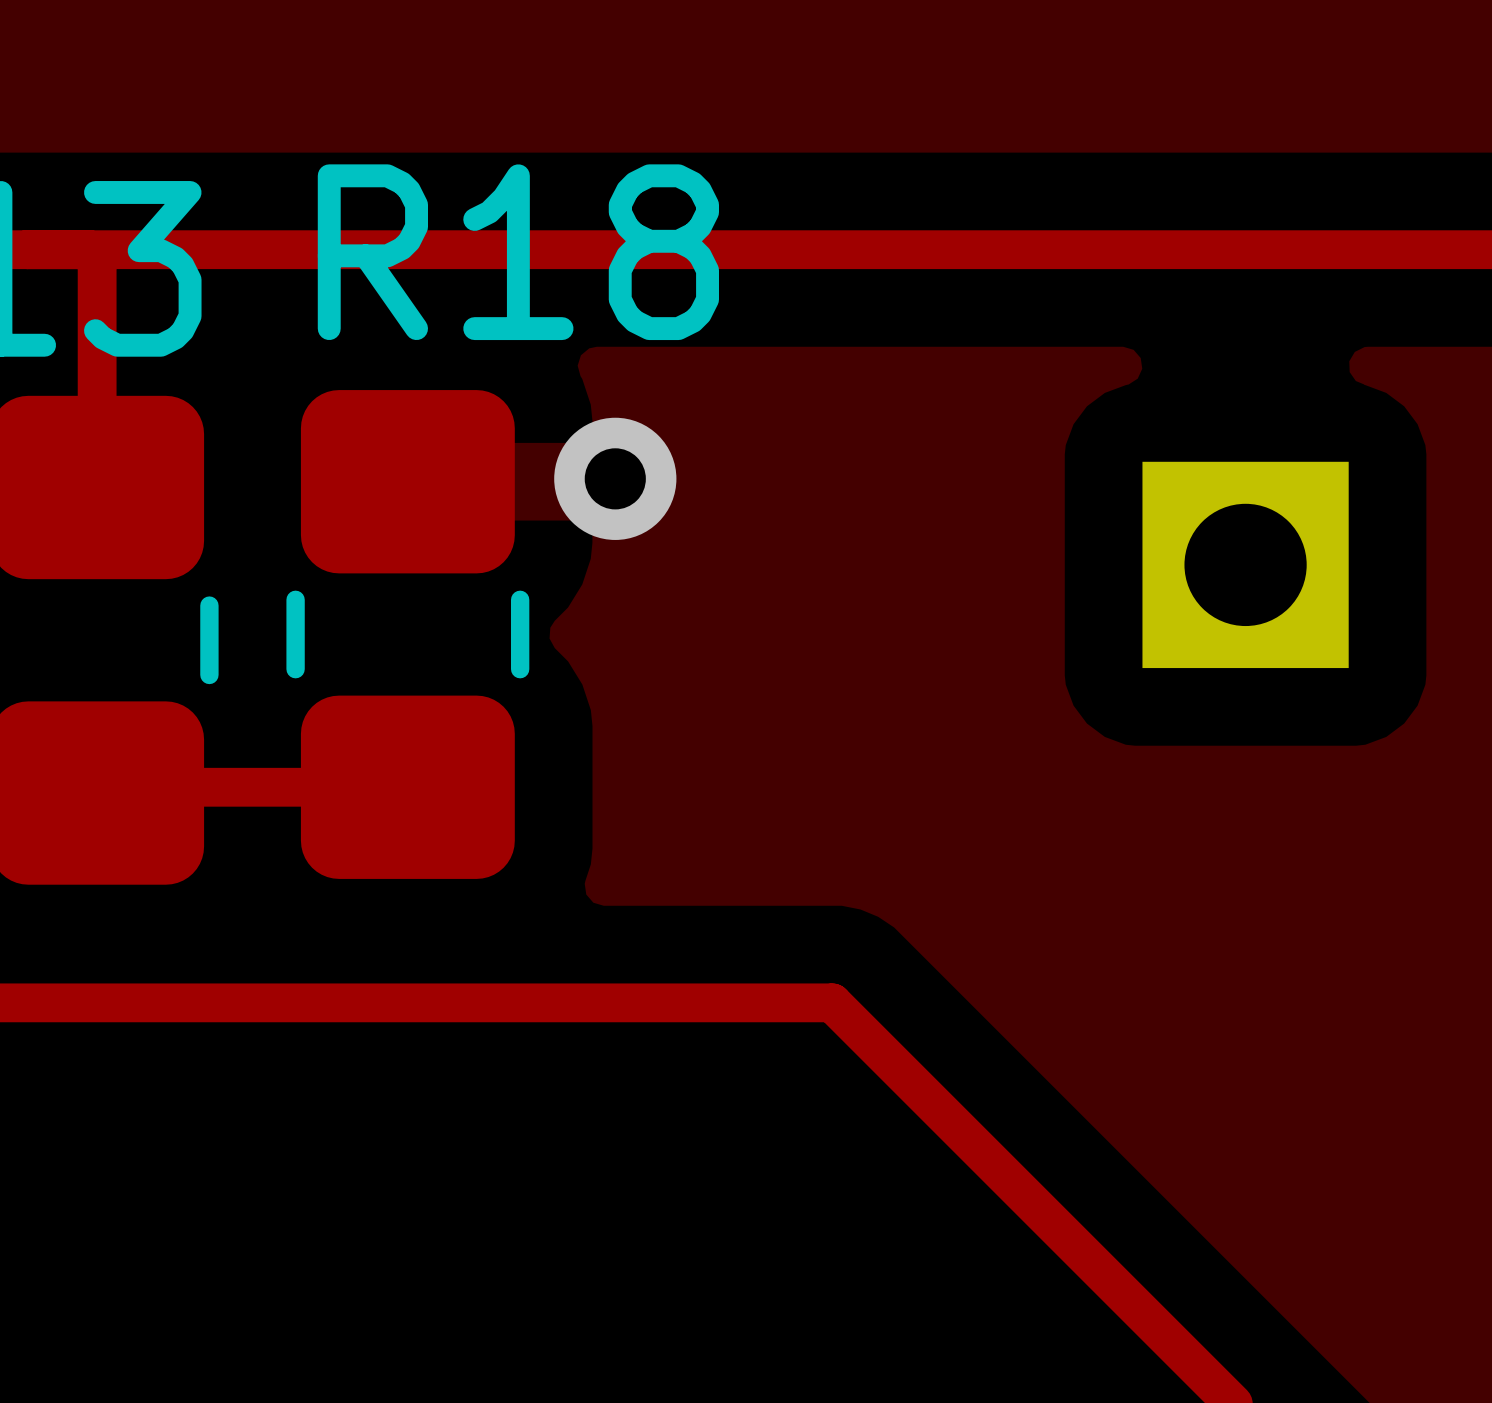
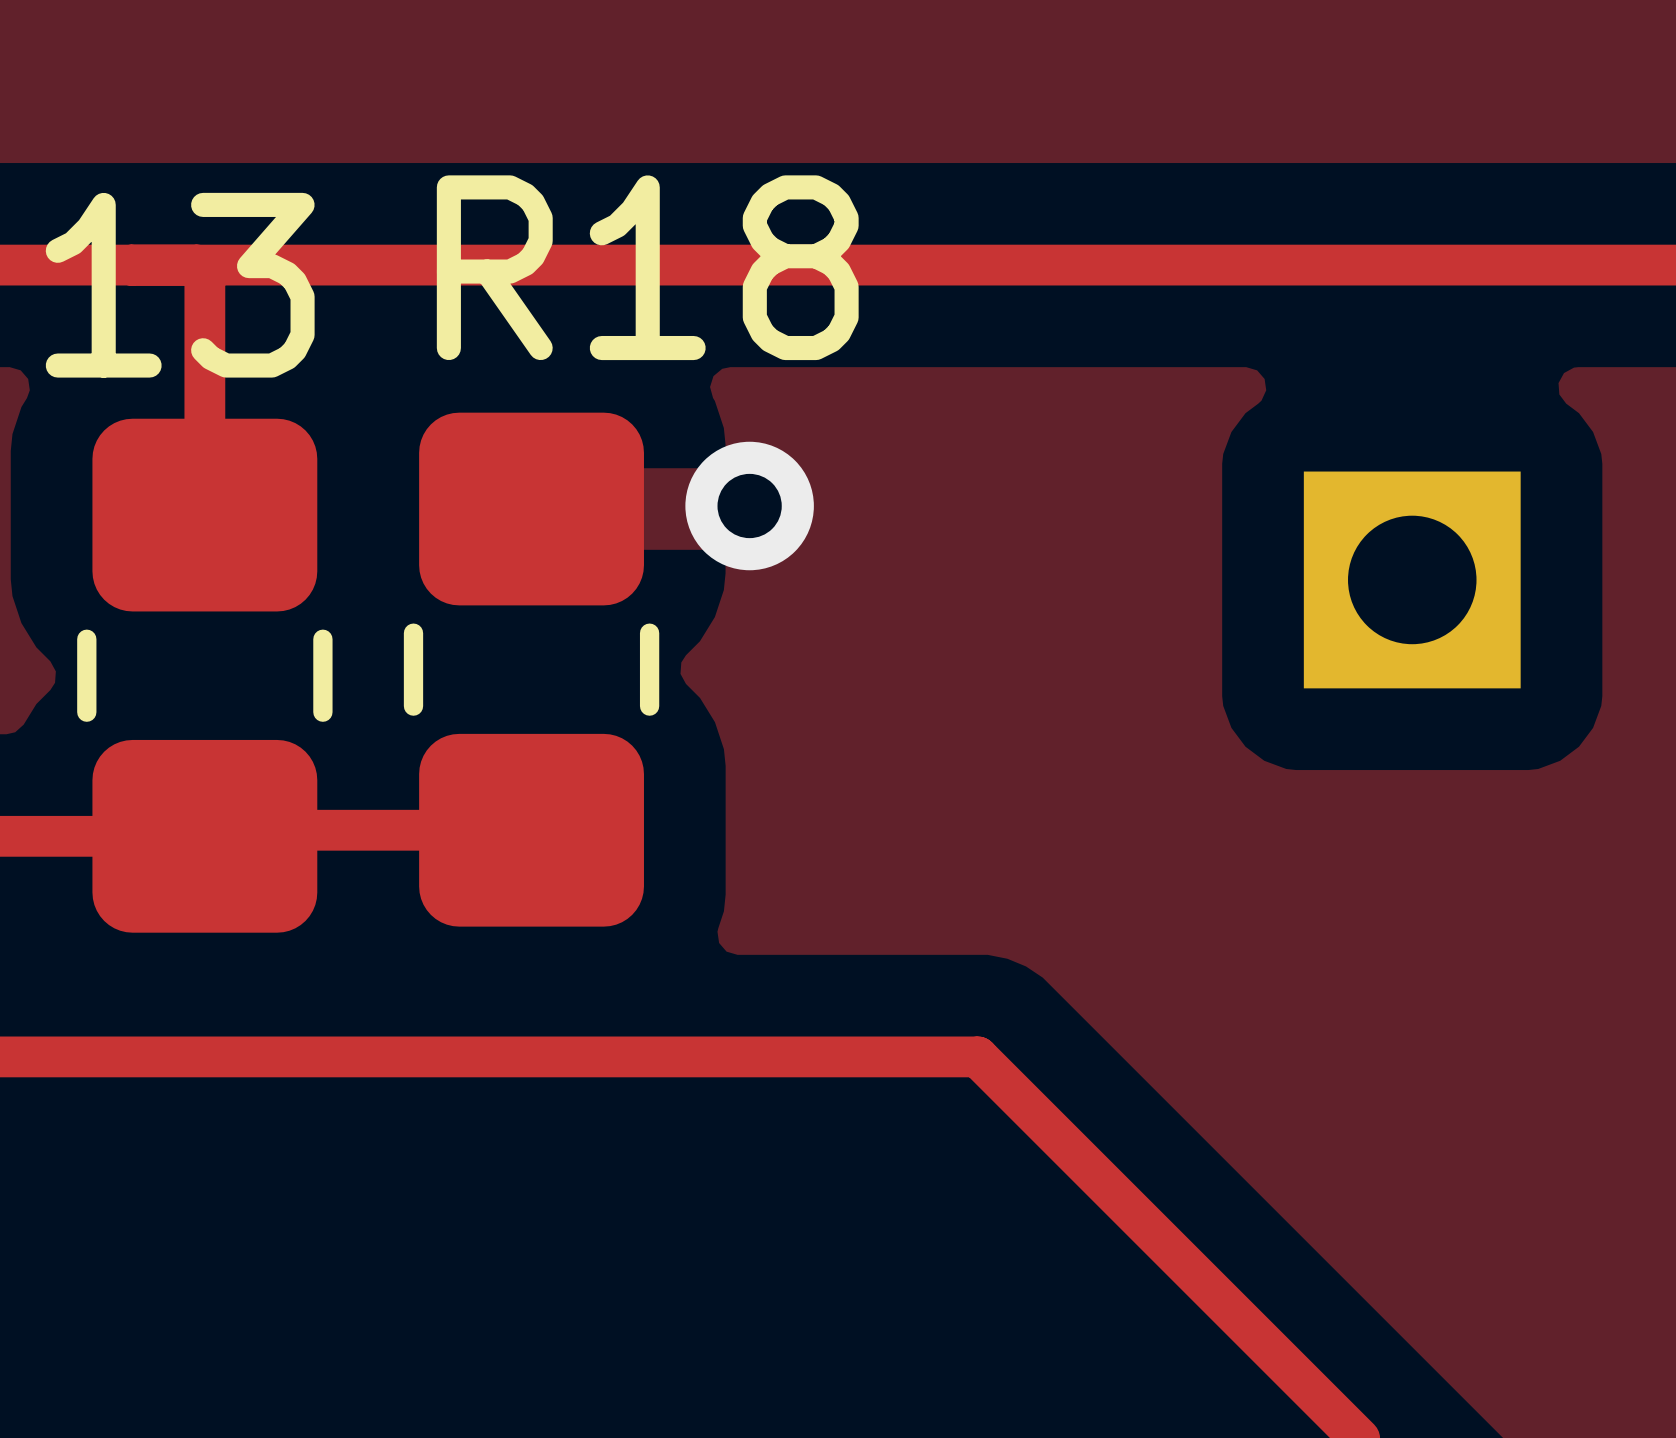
part position: (1245, 564) -> (1412, 579)

